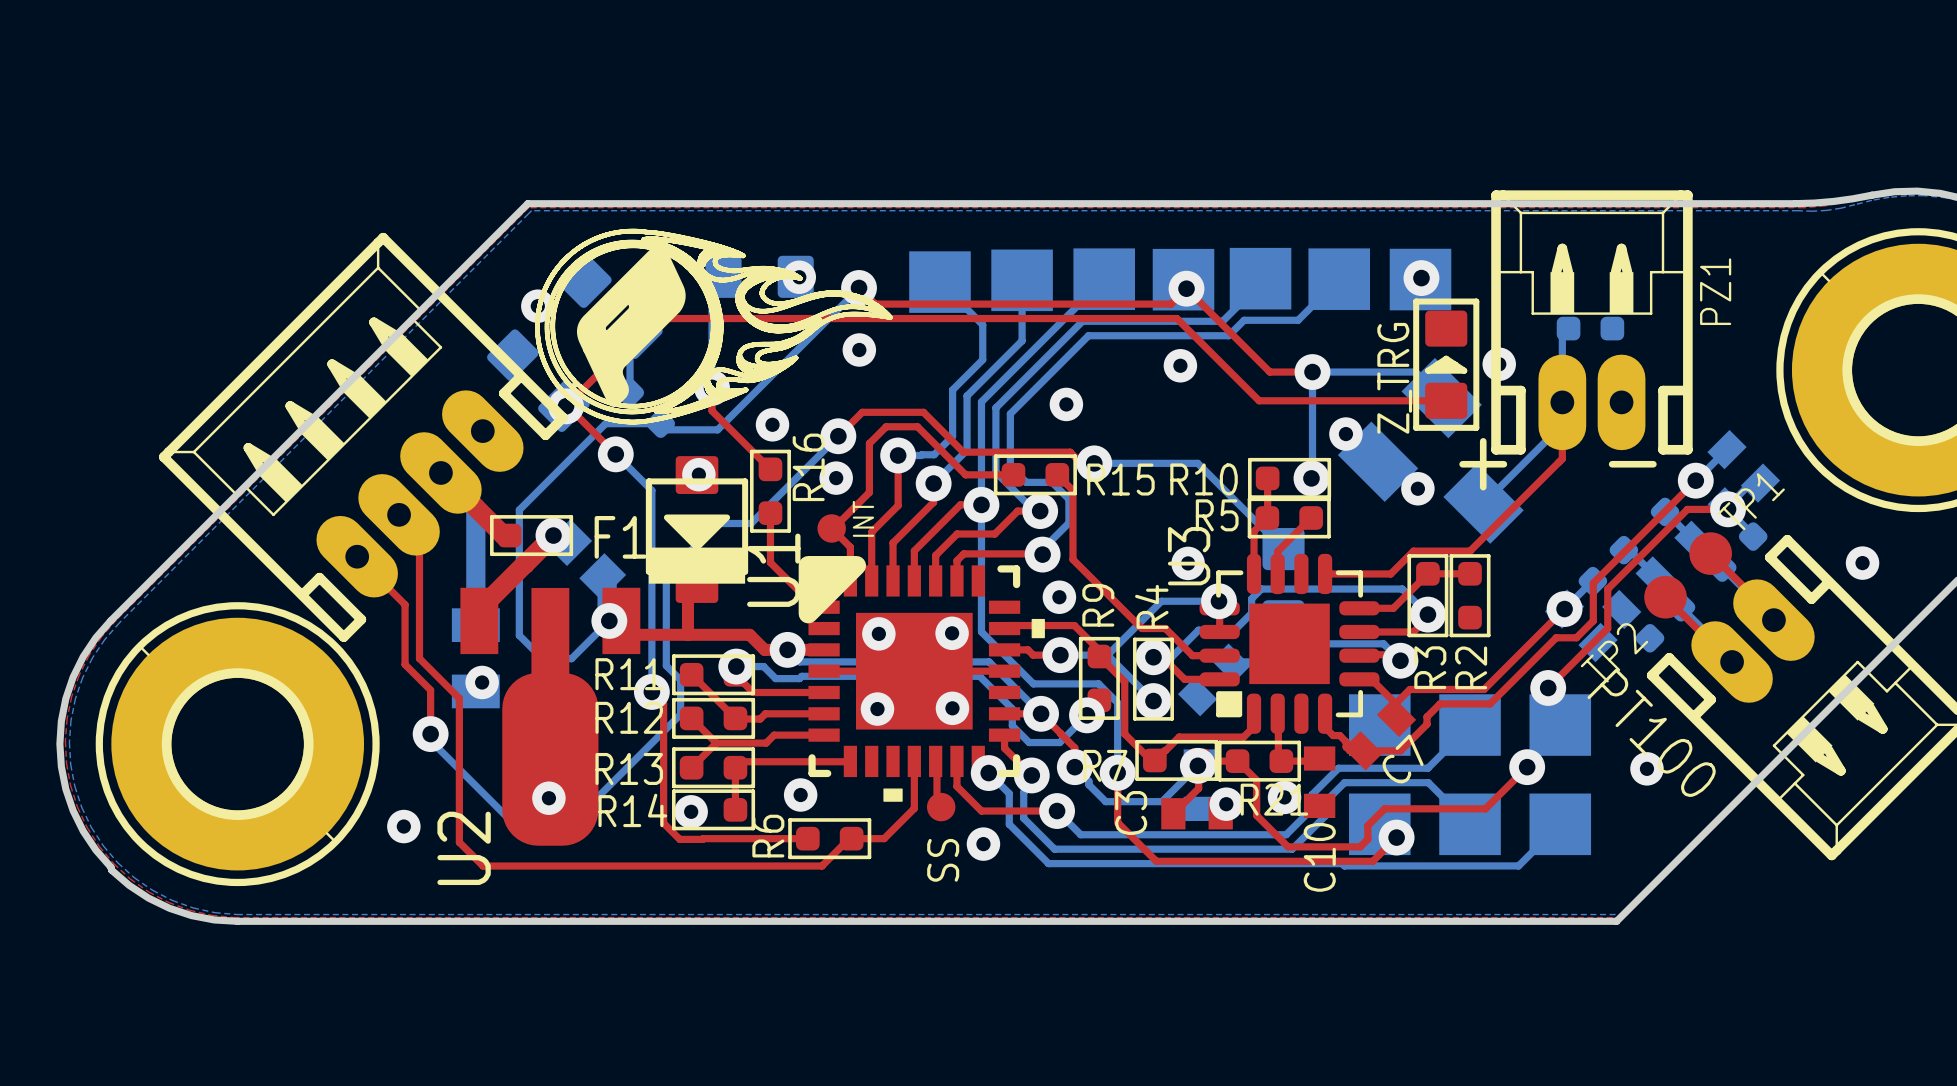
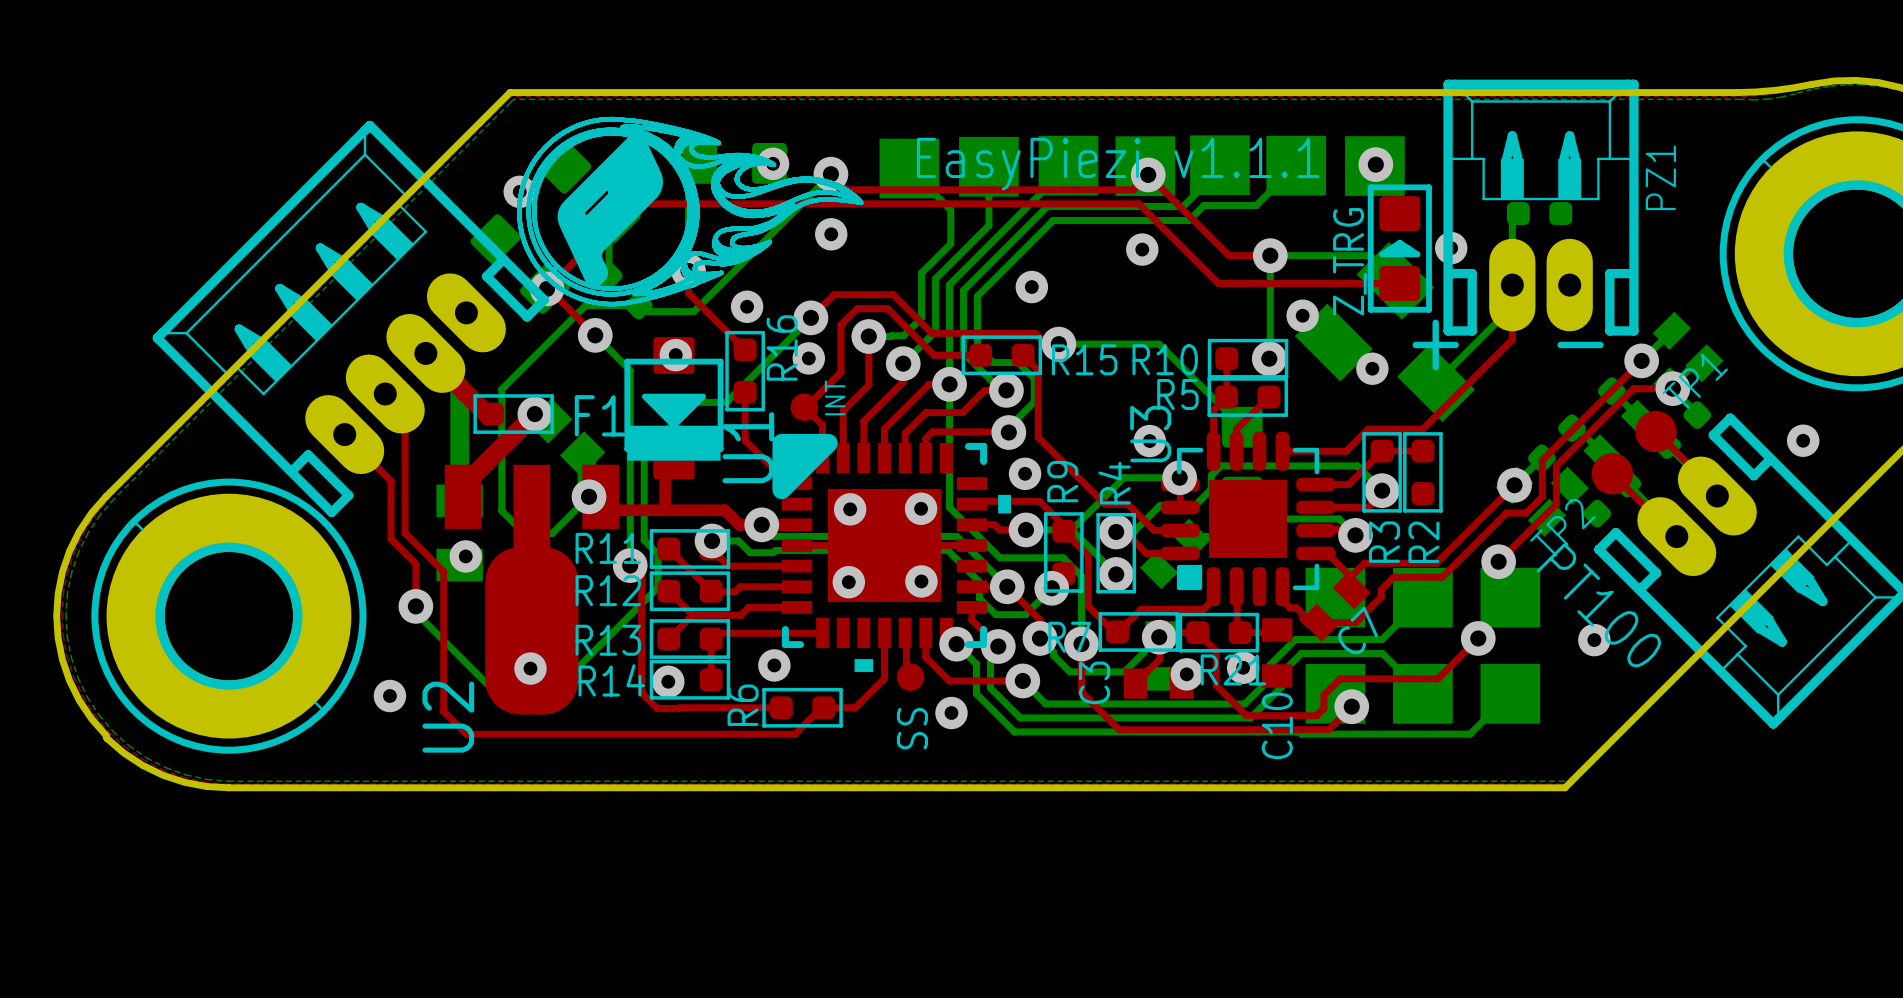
text: none -> EasyPiezi v1.1.1 (1118, 164)

